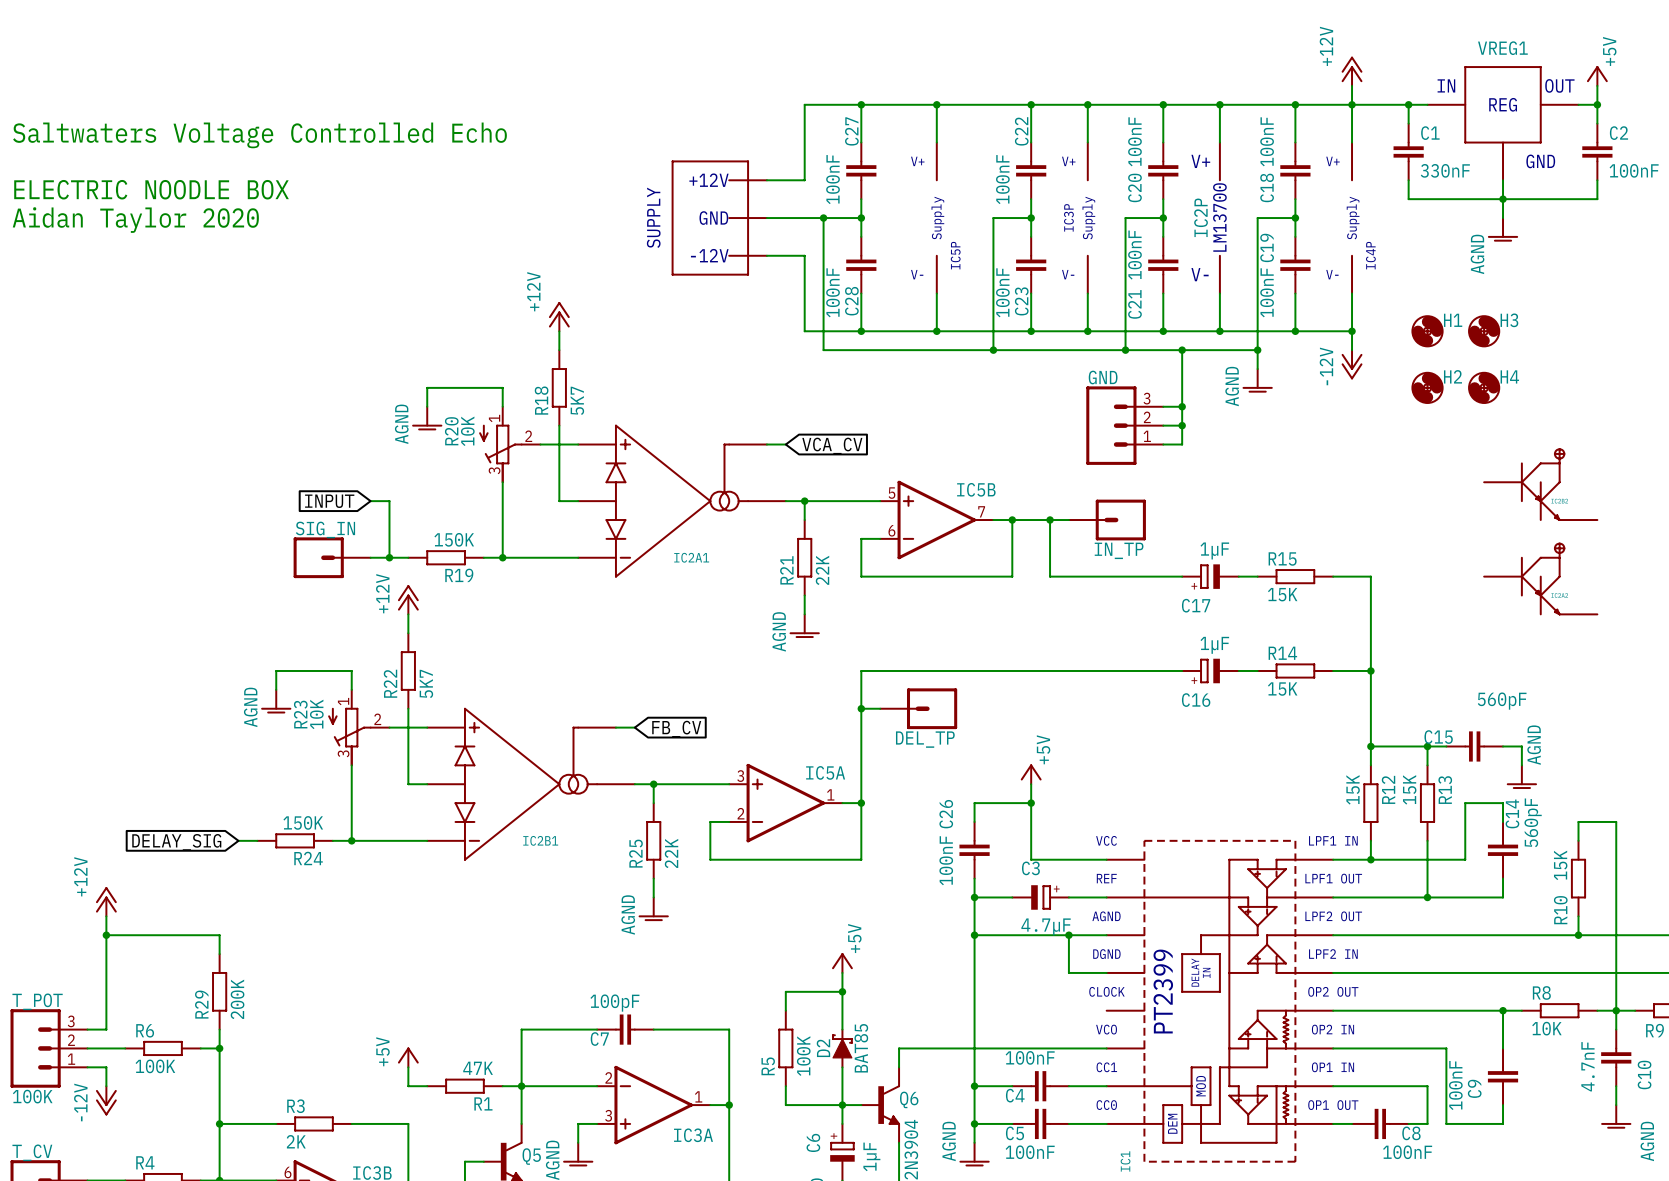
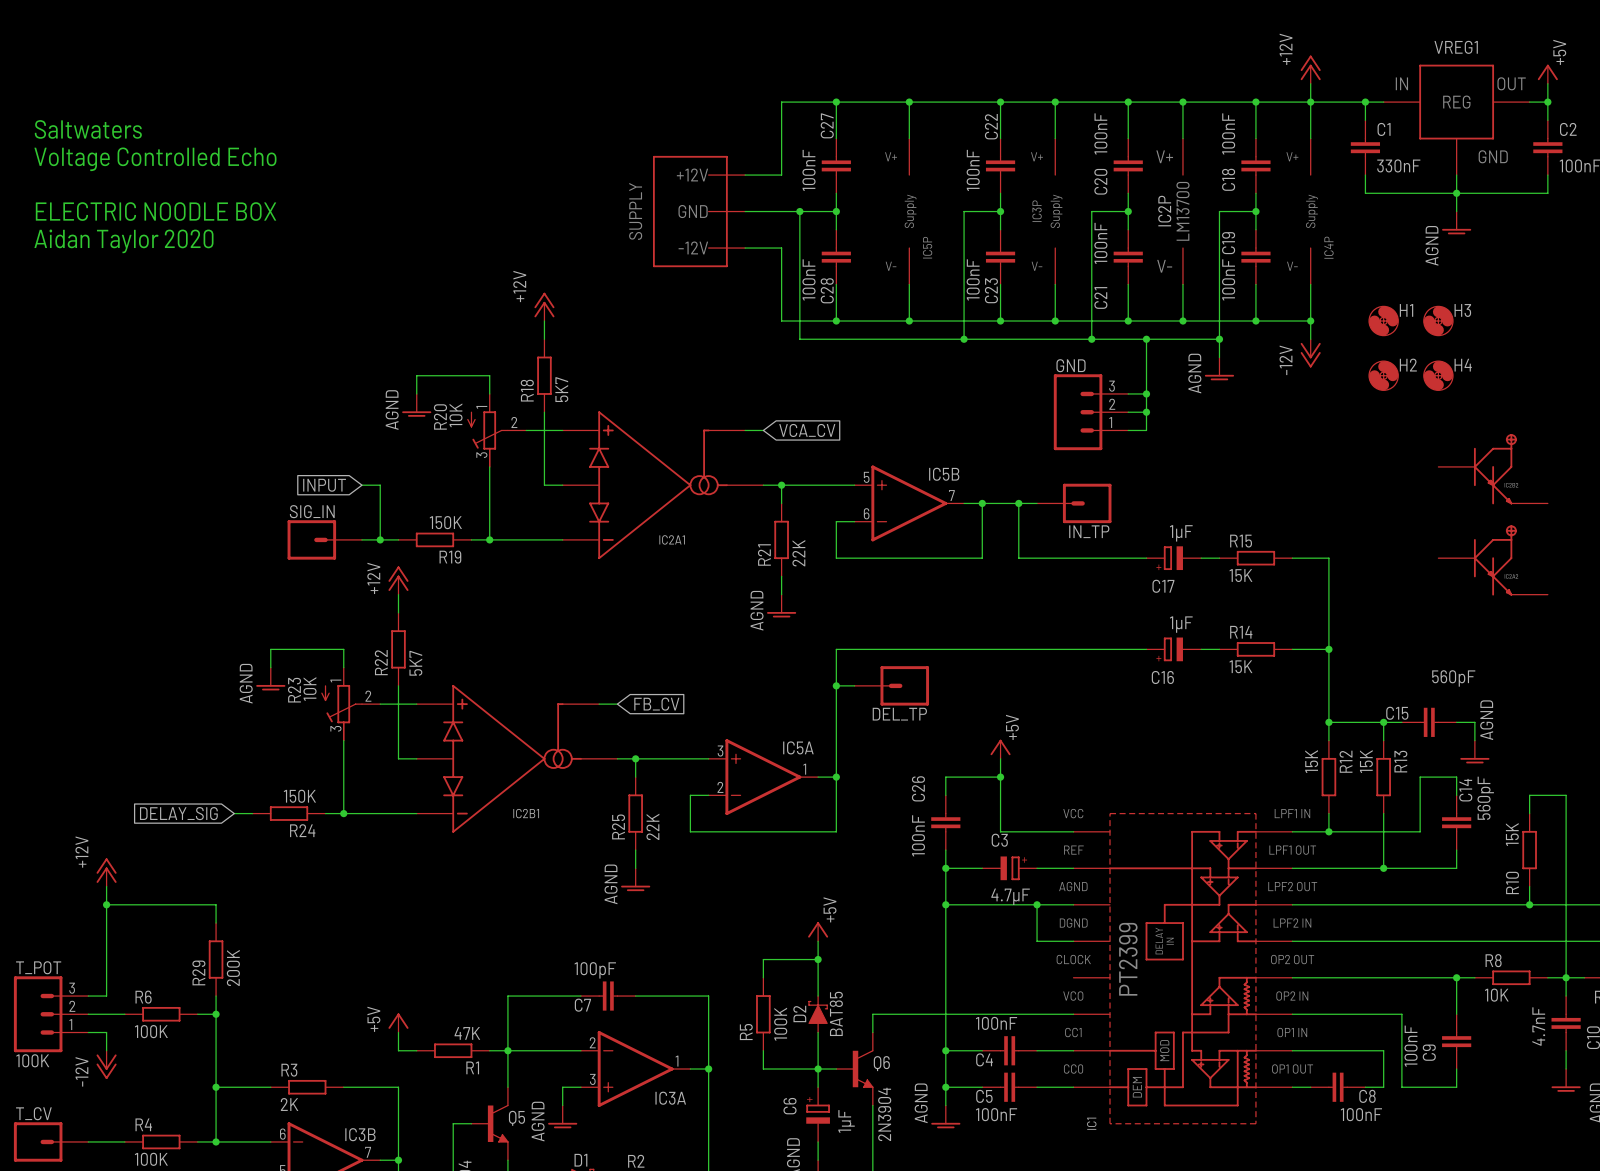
text: none -> Saltwaters (88, 129)
text: Saltwaters Voltage Controlled Echo (259, 135) -> Voltage Controlled Echo (155, 159)
text position: ELECTRIC NOODLE BOX (151, 189) -> ELECTRIC NOODLE BOX (156, 211)
text position: Aidan Taylor 2020 (135, 220) -> Aidan Taylor 2020 (123, 241)

